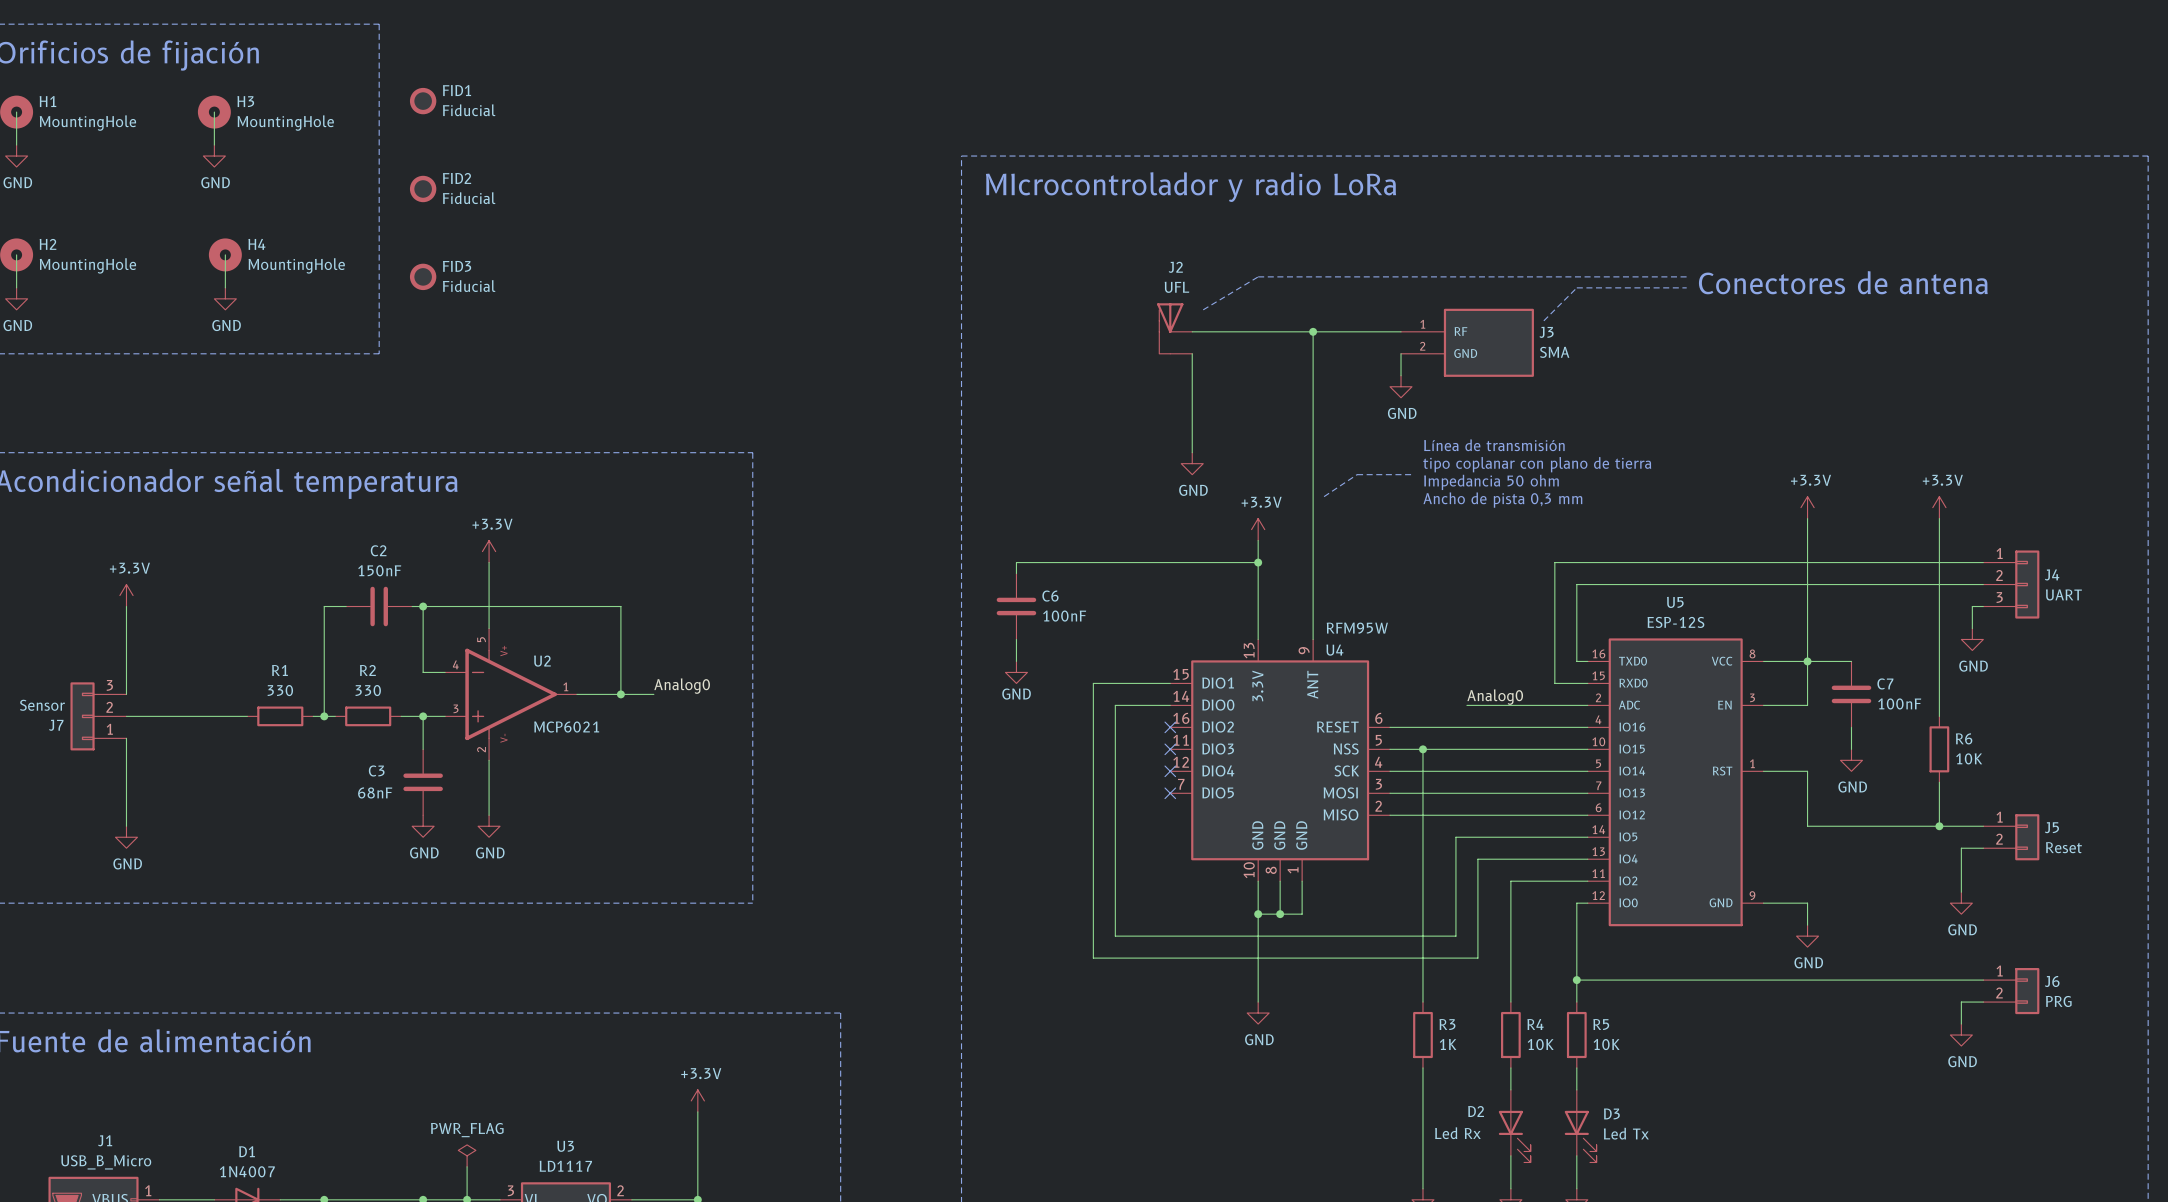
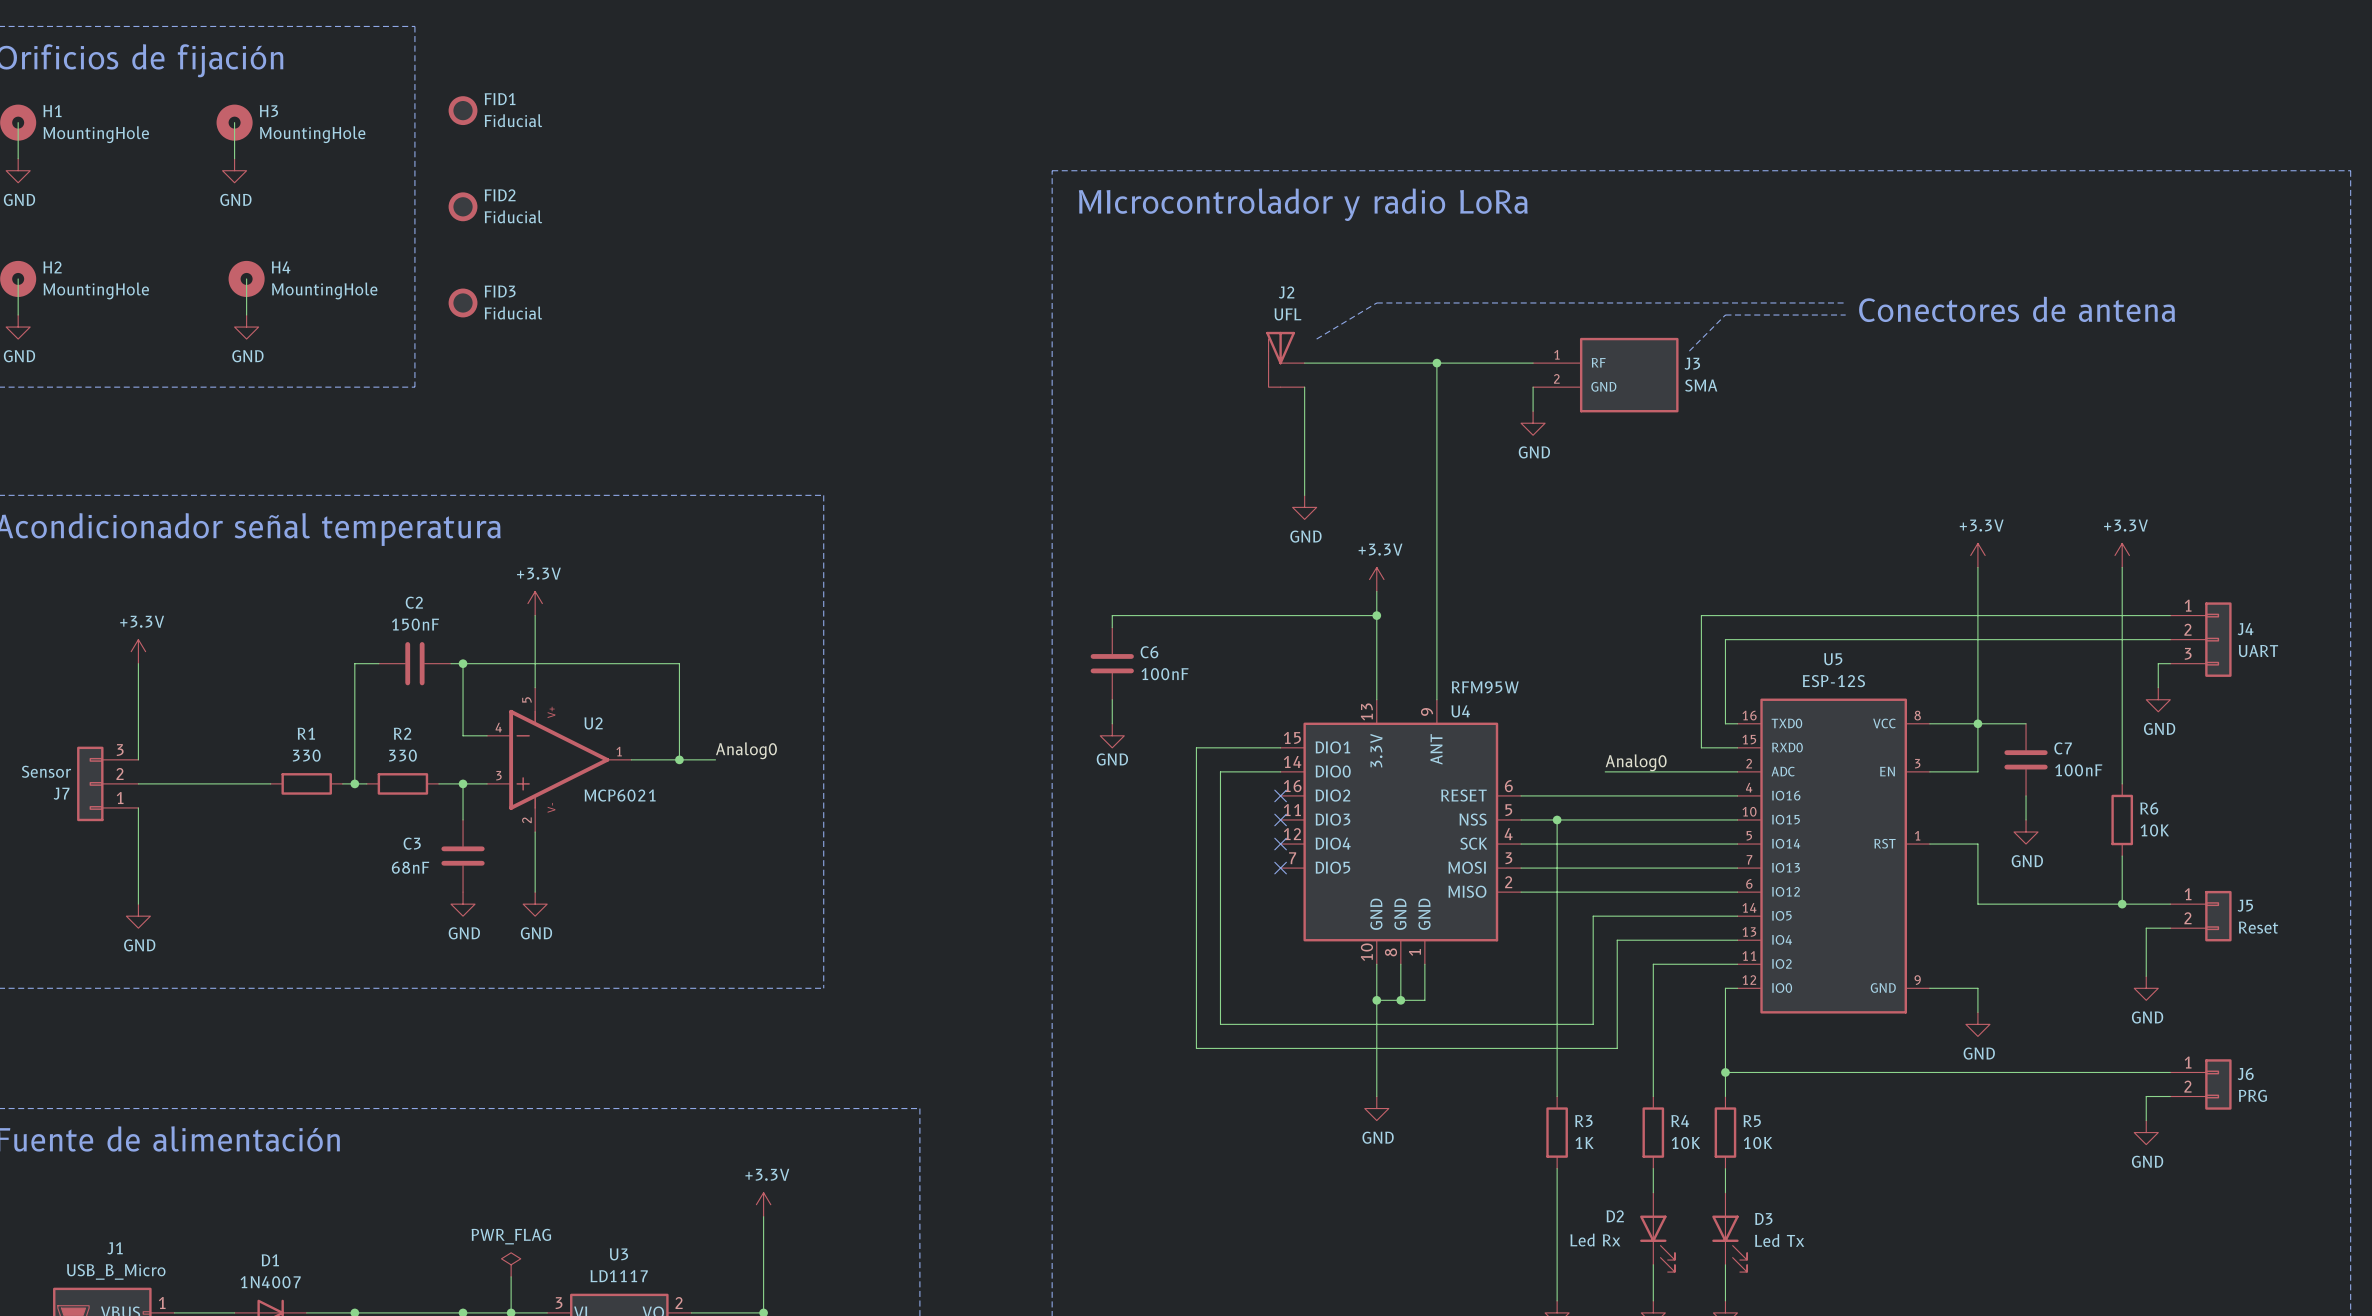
text: Línea de transmisión (1494, 445) -> none
text: tipo coplanar con plano de tierra (1537, 464) -> none
line: (1412, 474) (1357, 474) (1324, 496) -> none
text: Impedancia 50 ohm (1491, 482) -> none
text: Ancho de pista 0,3 mm (1502, 500) -> none

